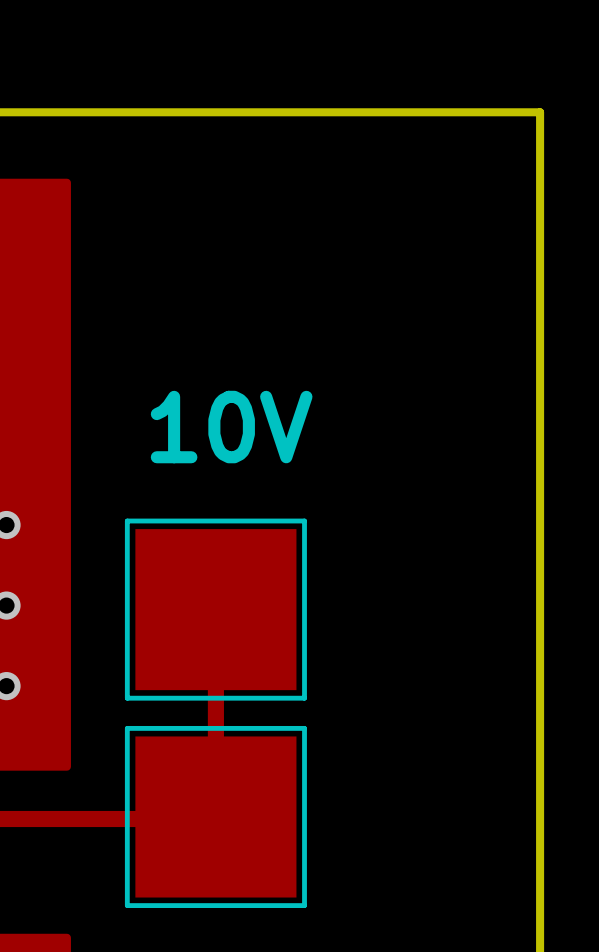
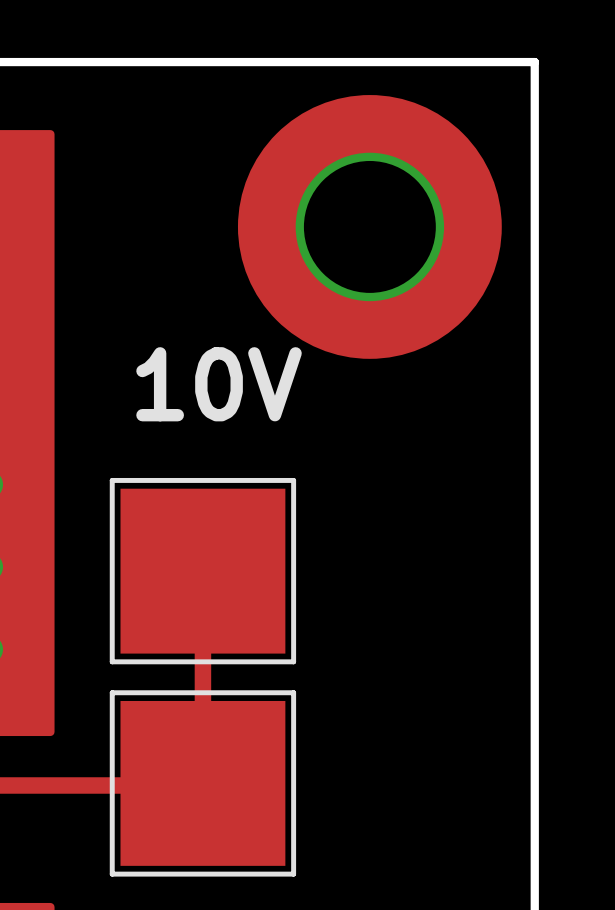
part: none -> (369, 226)

